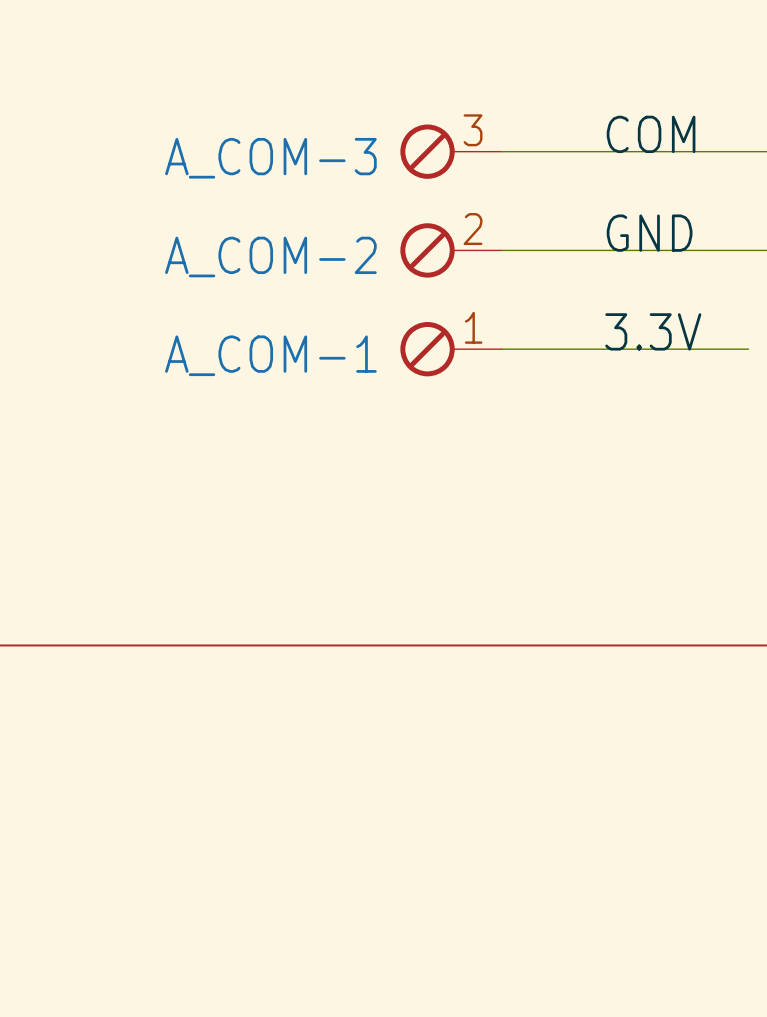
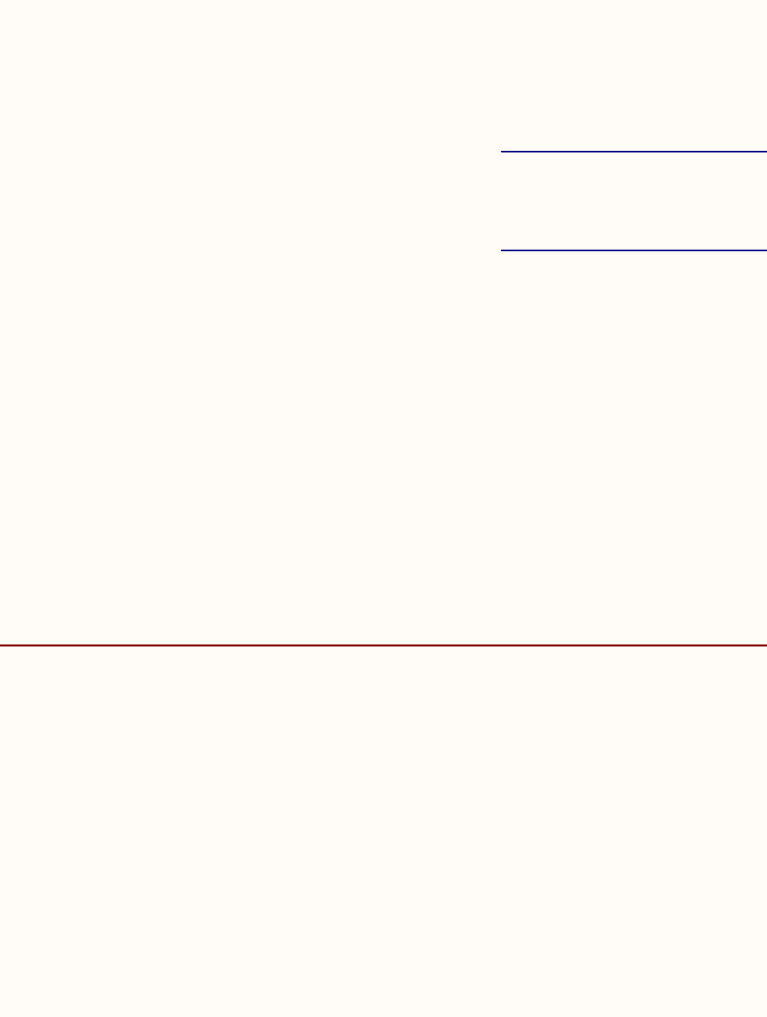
label: COM (651, 134) -> none
A_COM-3: (450, 151) -> none
label: GND (649, 233) -> none
A_COM-2: (450, 250) -> none
label: 3.3V (653, 331) -> none
A_COM-1: (450, 349) -> none
wire: (501, 349) (748, 349) -> none

